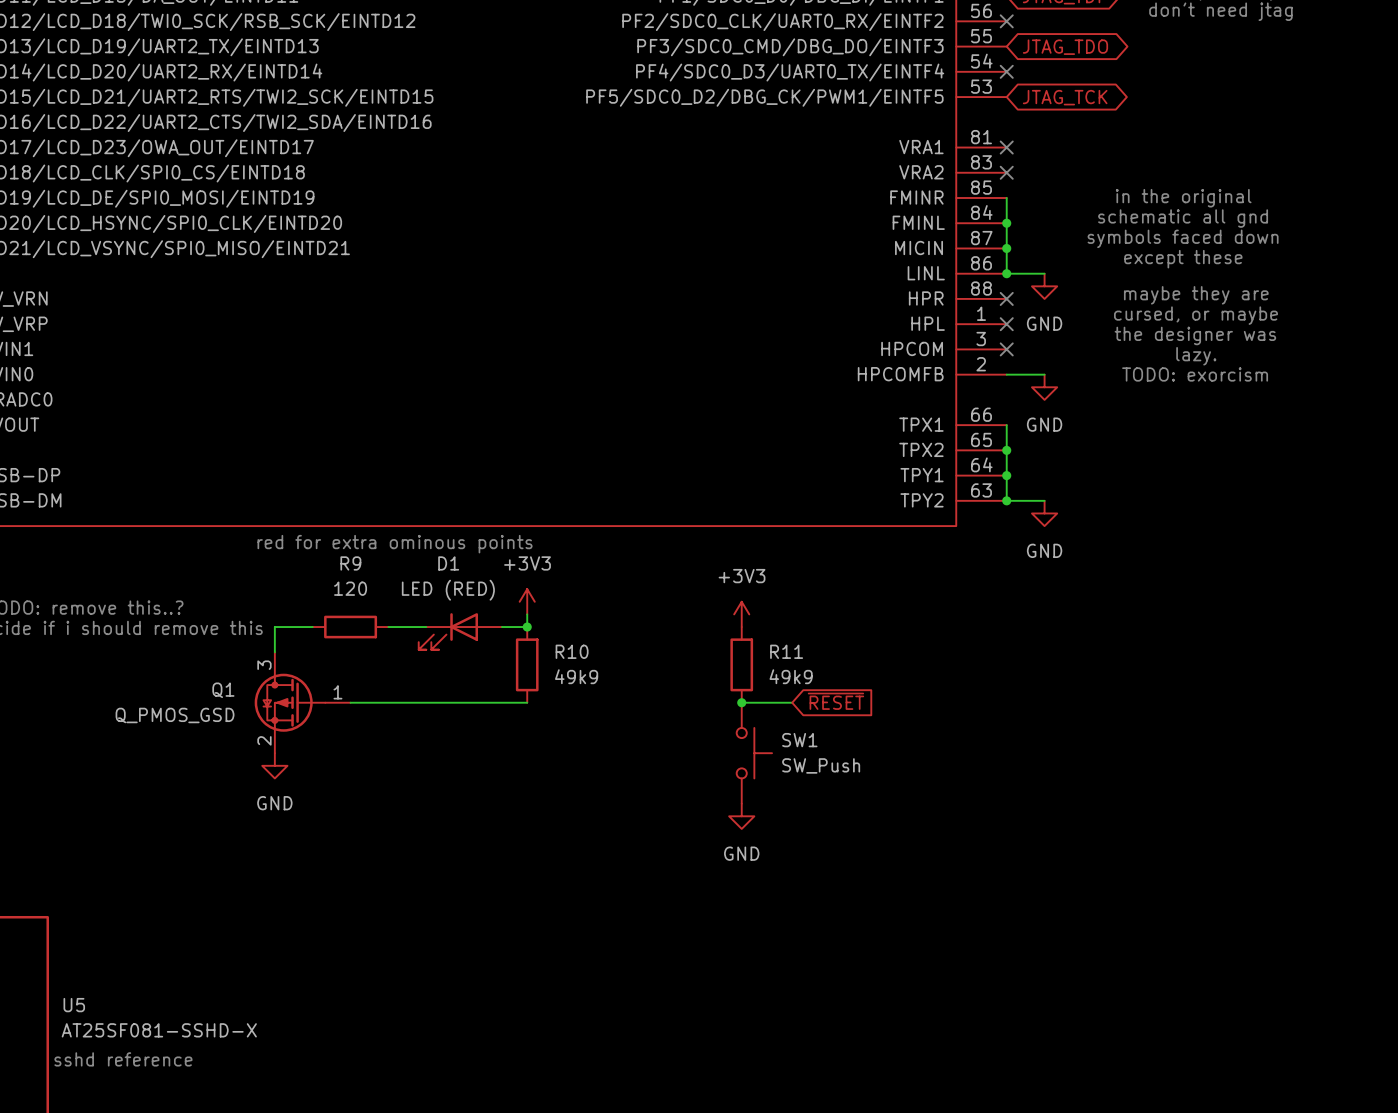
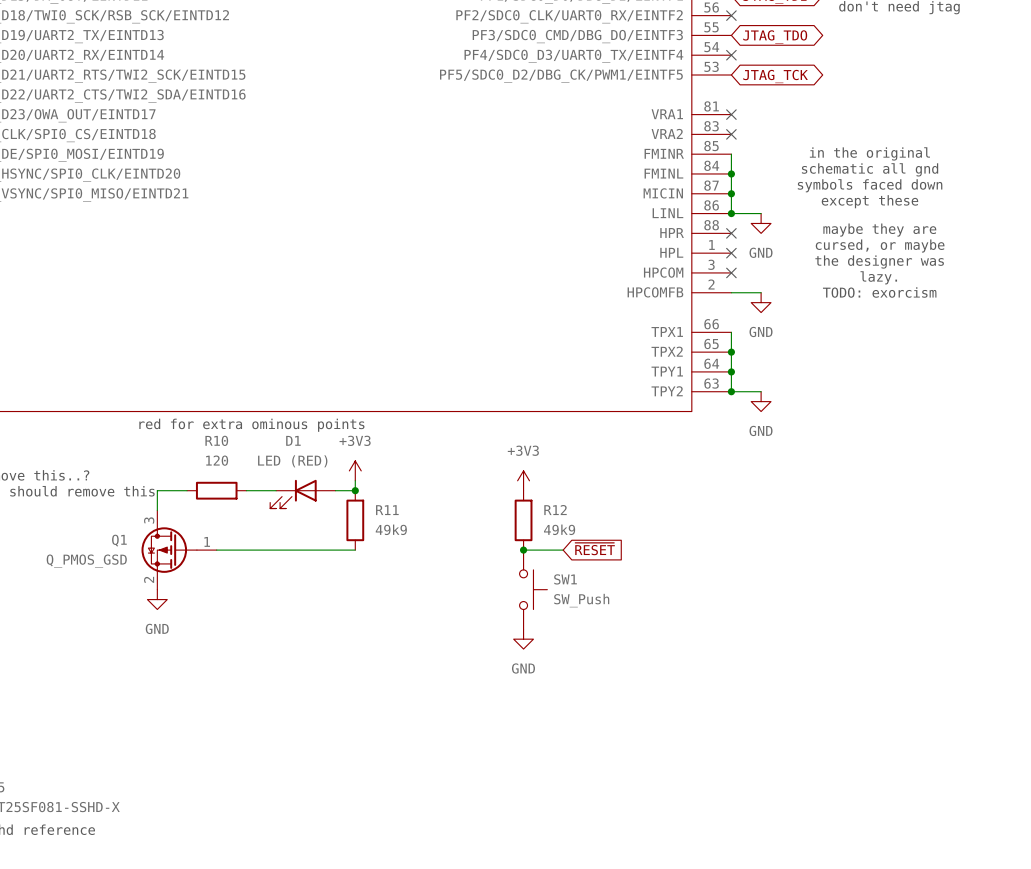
R9 name: R9 (350, 563) -> R10 (216, 440)
R10 name: R10 (572, 651) -> R11 (387, 510)
R11 name: R11 (786, 651) -> R12 (555, 510)

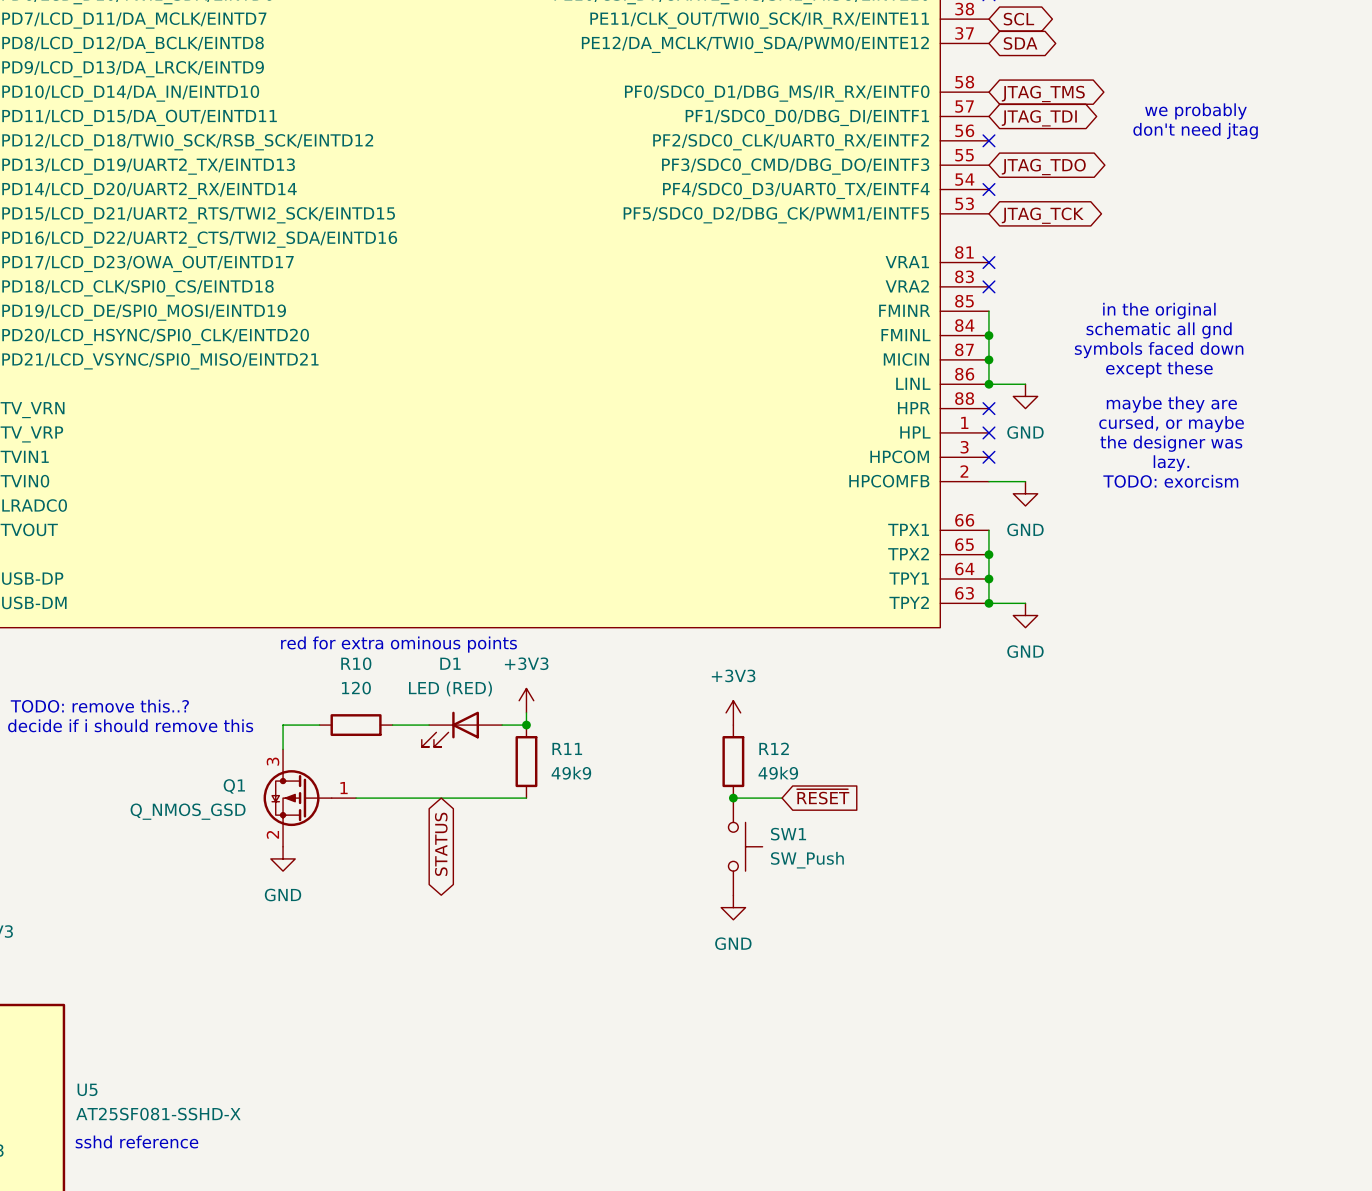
Q1 value: Q_PMOS_GSD (86, 561) -> Q_NMOS_GSD (188, 811)
global label: none -> STATUS (441, 844)

